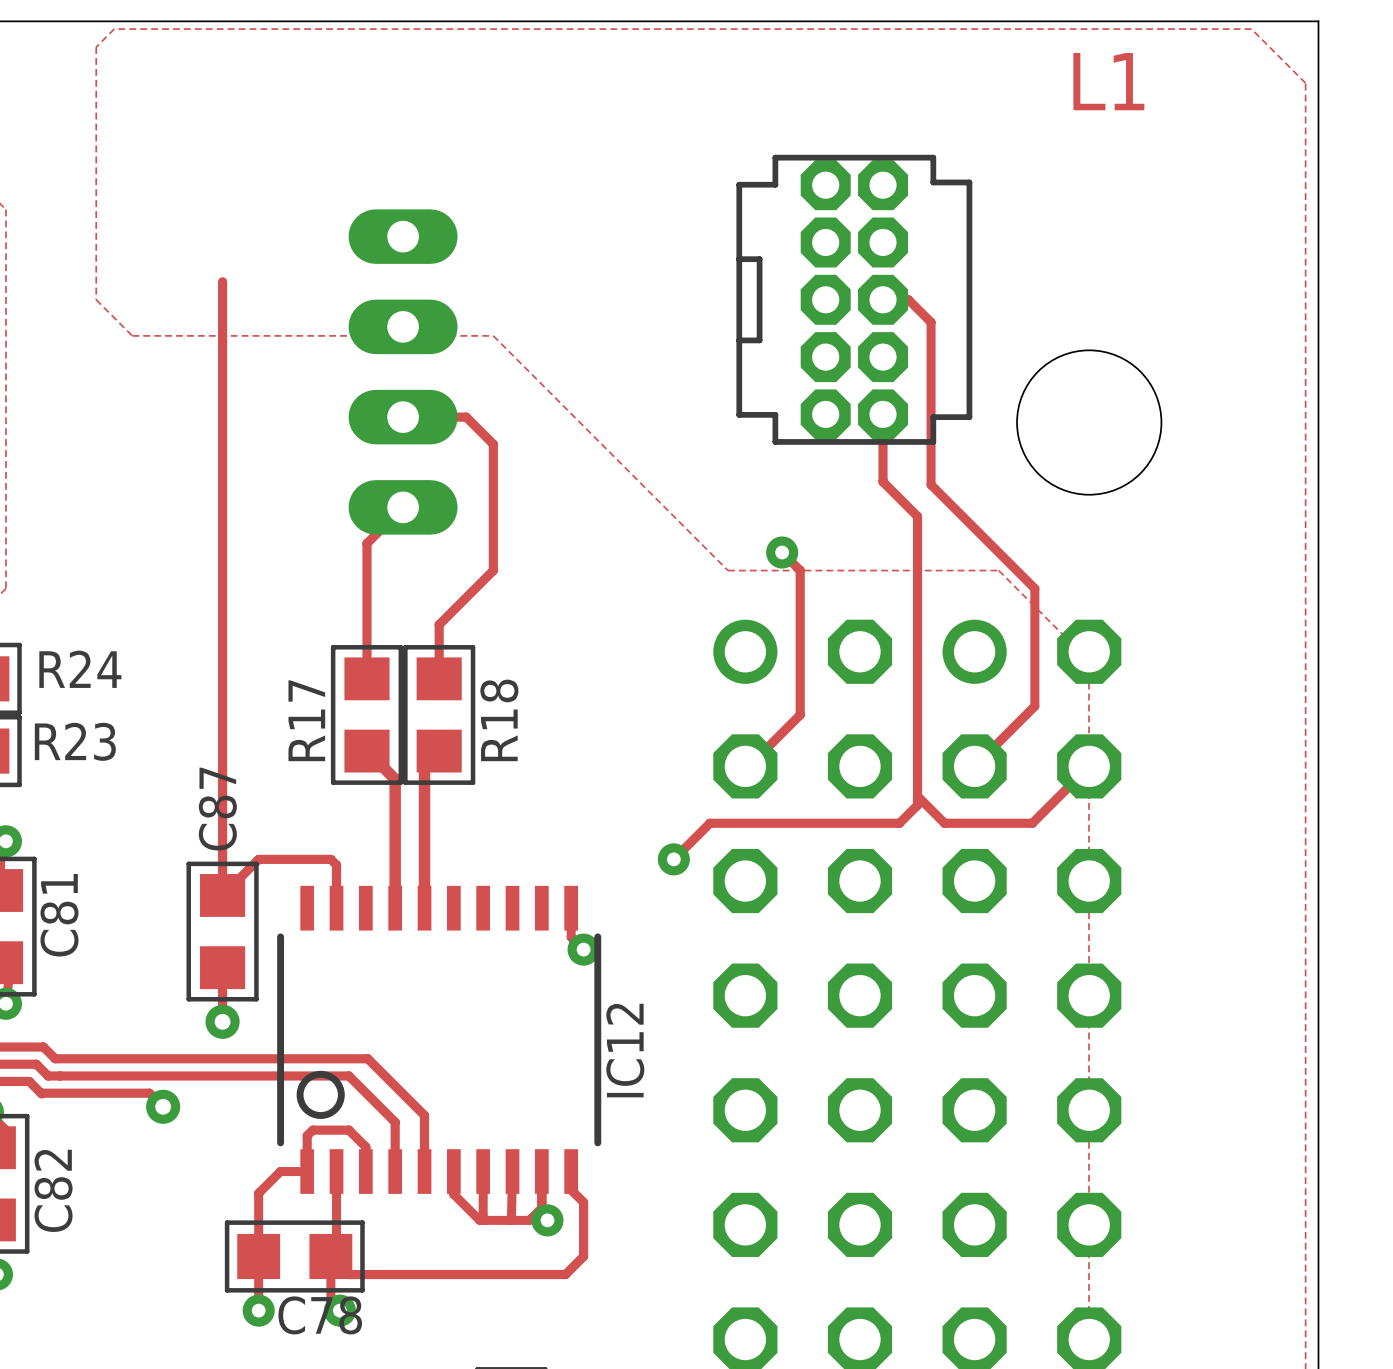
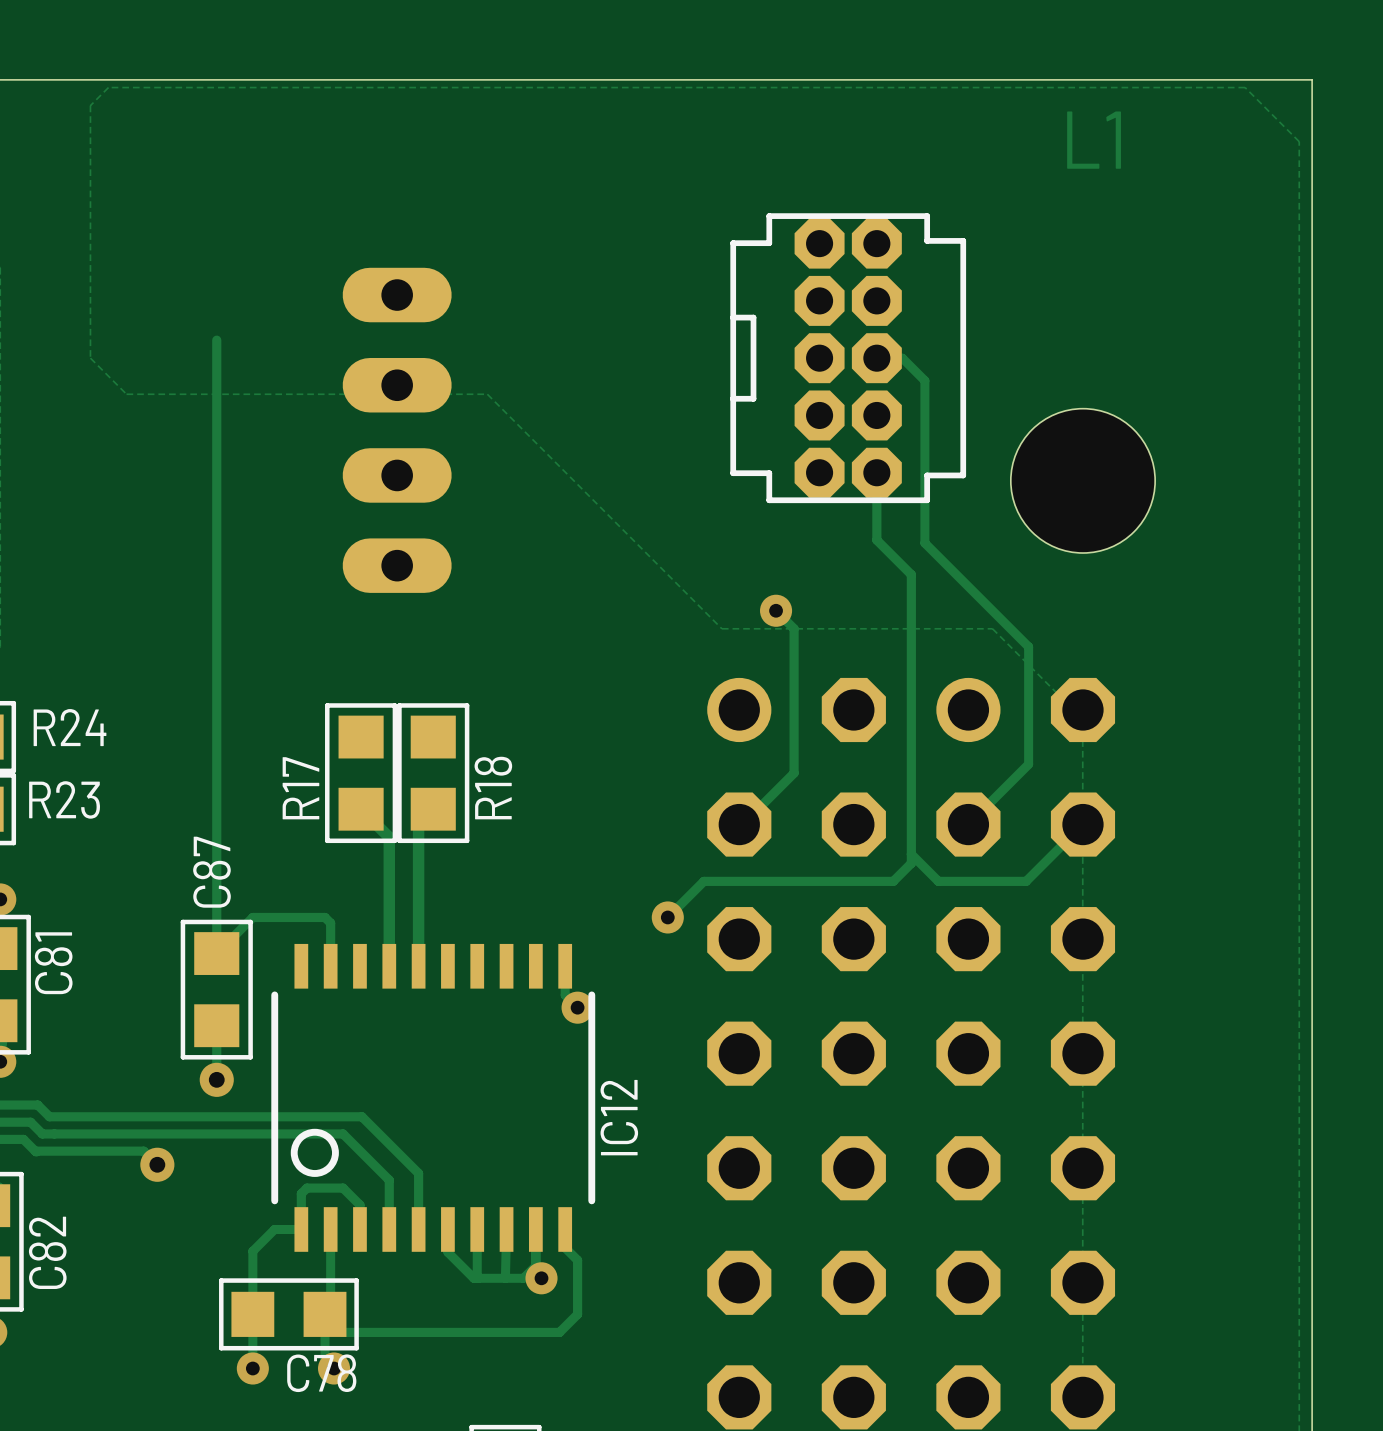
track: (403, 417) (466, 417) (493, 444) (493, 570) (439, 624) (439, 678) -> none
track: (403, 507) (366, 543) (366, 678) -> none

